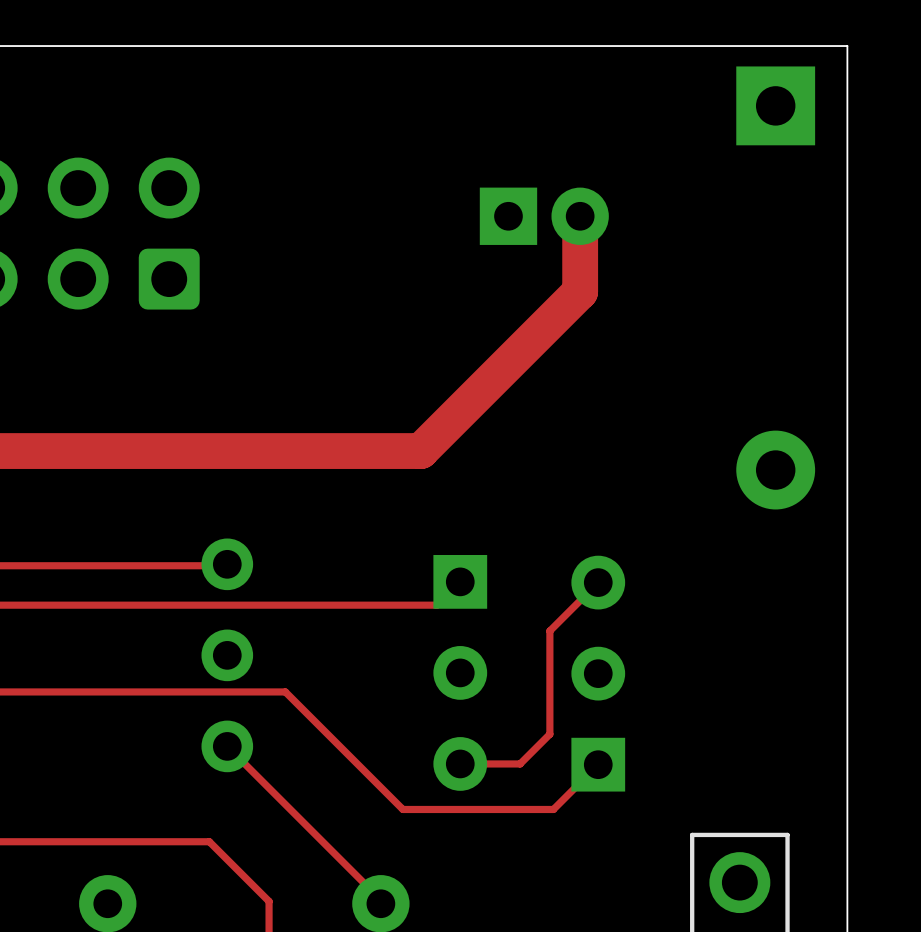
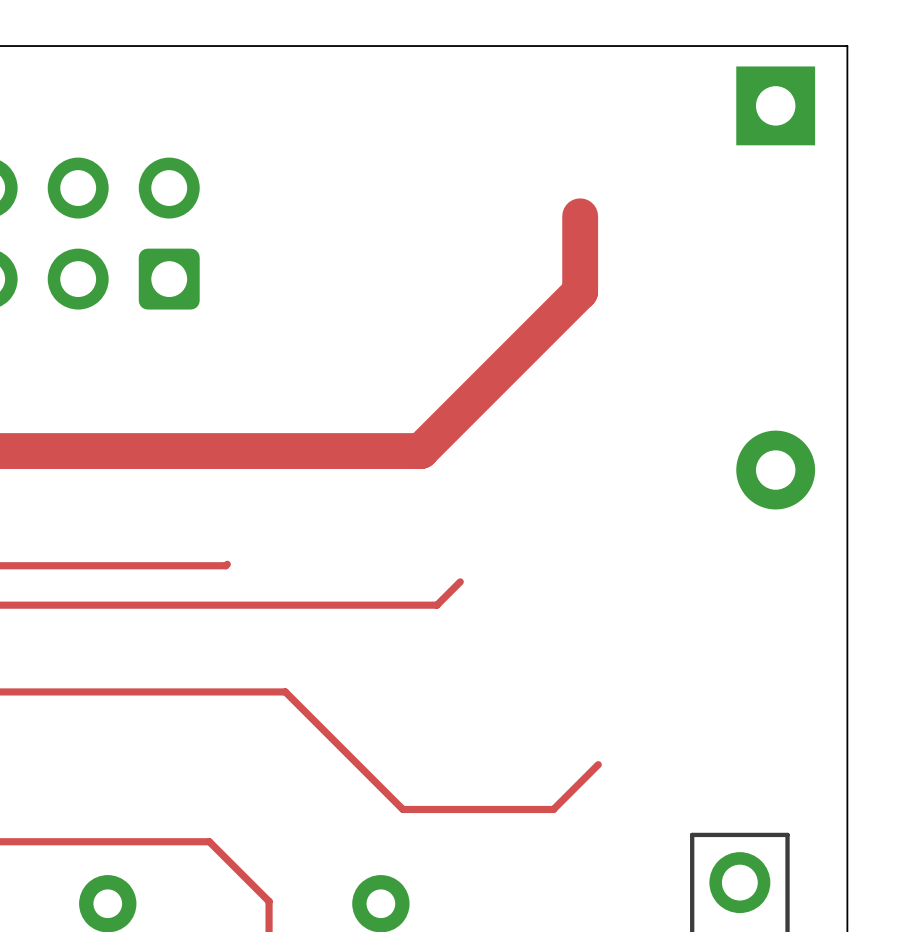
part: (544, 216) -> none
track: (598, 582) (549, 630) (549, 734) (520, 763) (460, 763) -> none
part: (227, 655) -> none
part: (460, 672) -> none
part: (598, 673) -> none
track: (227, 746) (380, 899) (380, 903) -> none

